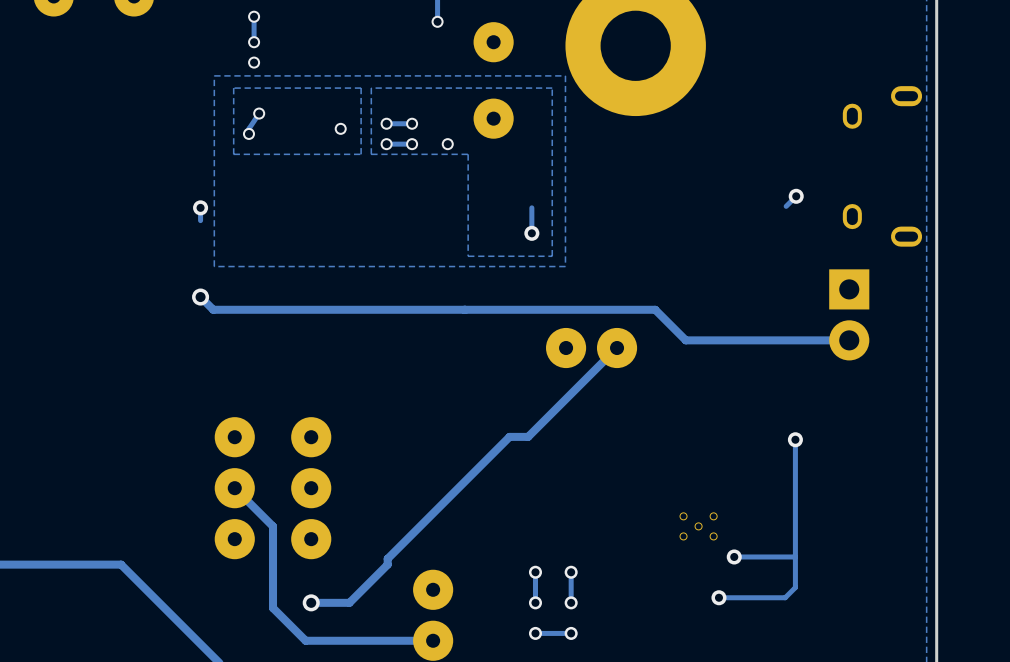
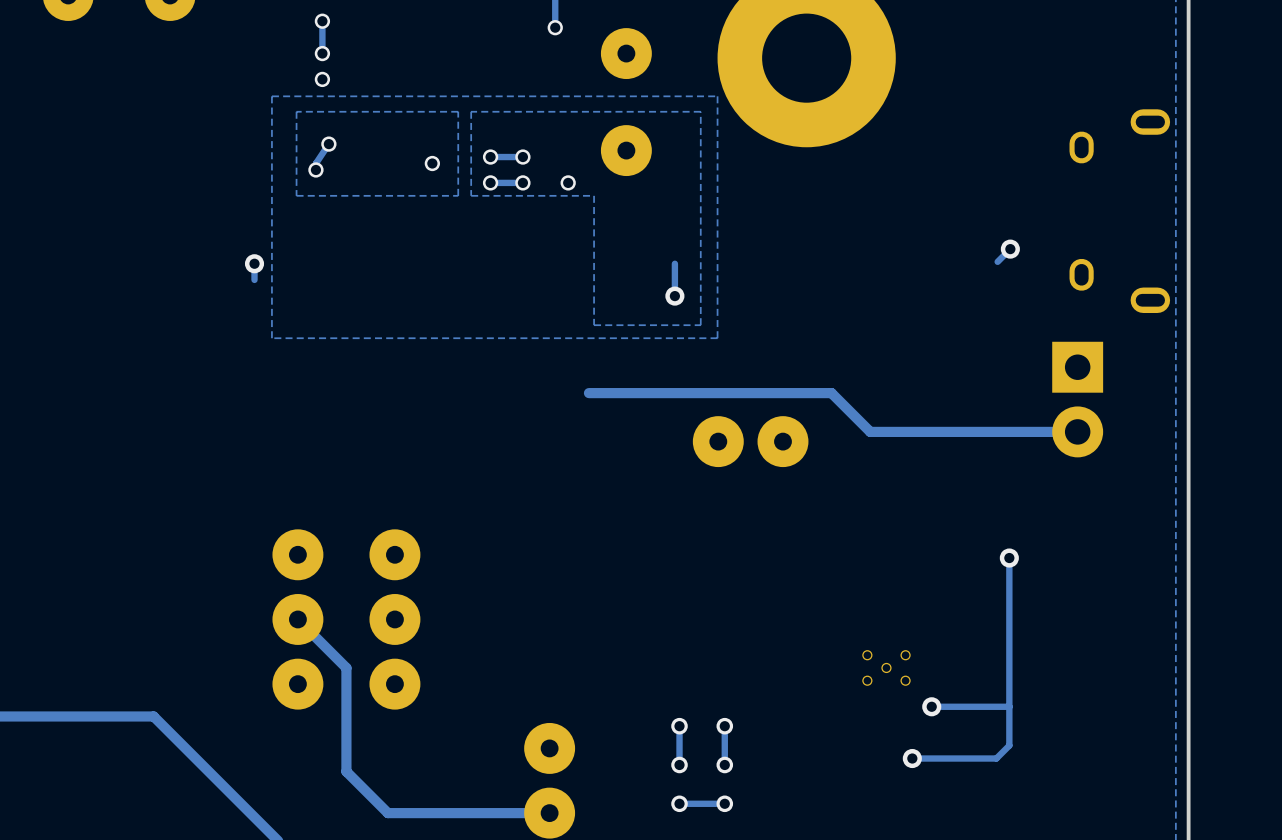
track: (200, 297) (213, 309) (464, 309) -> none
via: (200, 297) -> none
track: (617, 348) (528, 436) (509, 436) (387, 558) (387, 564) (349, 602) (311, 602) -> none
via: (311, 602) -> none

